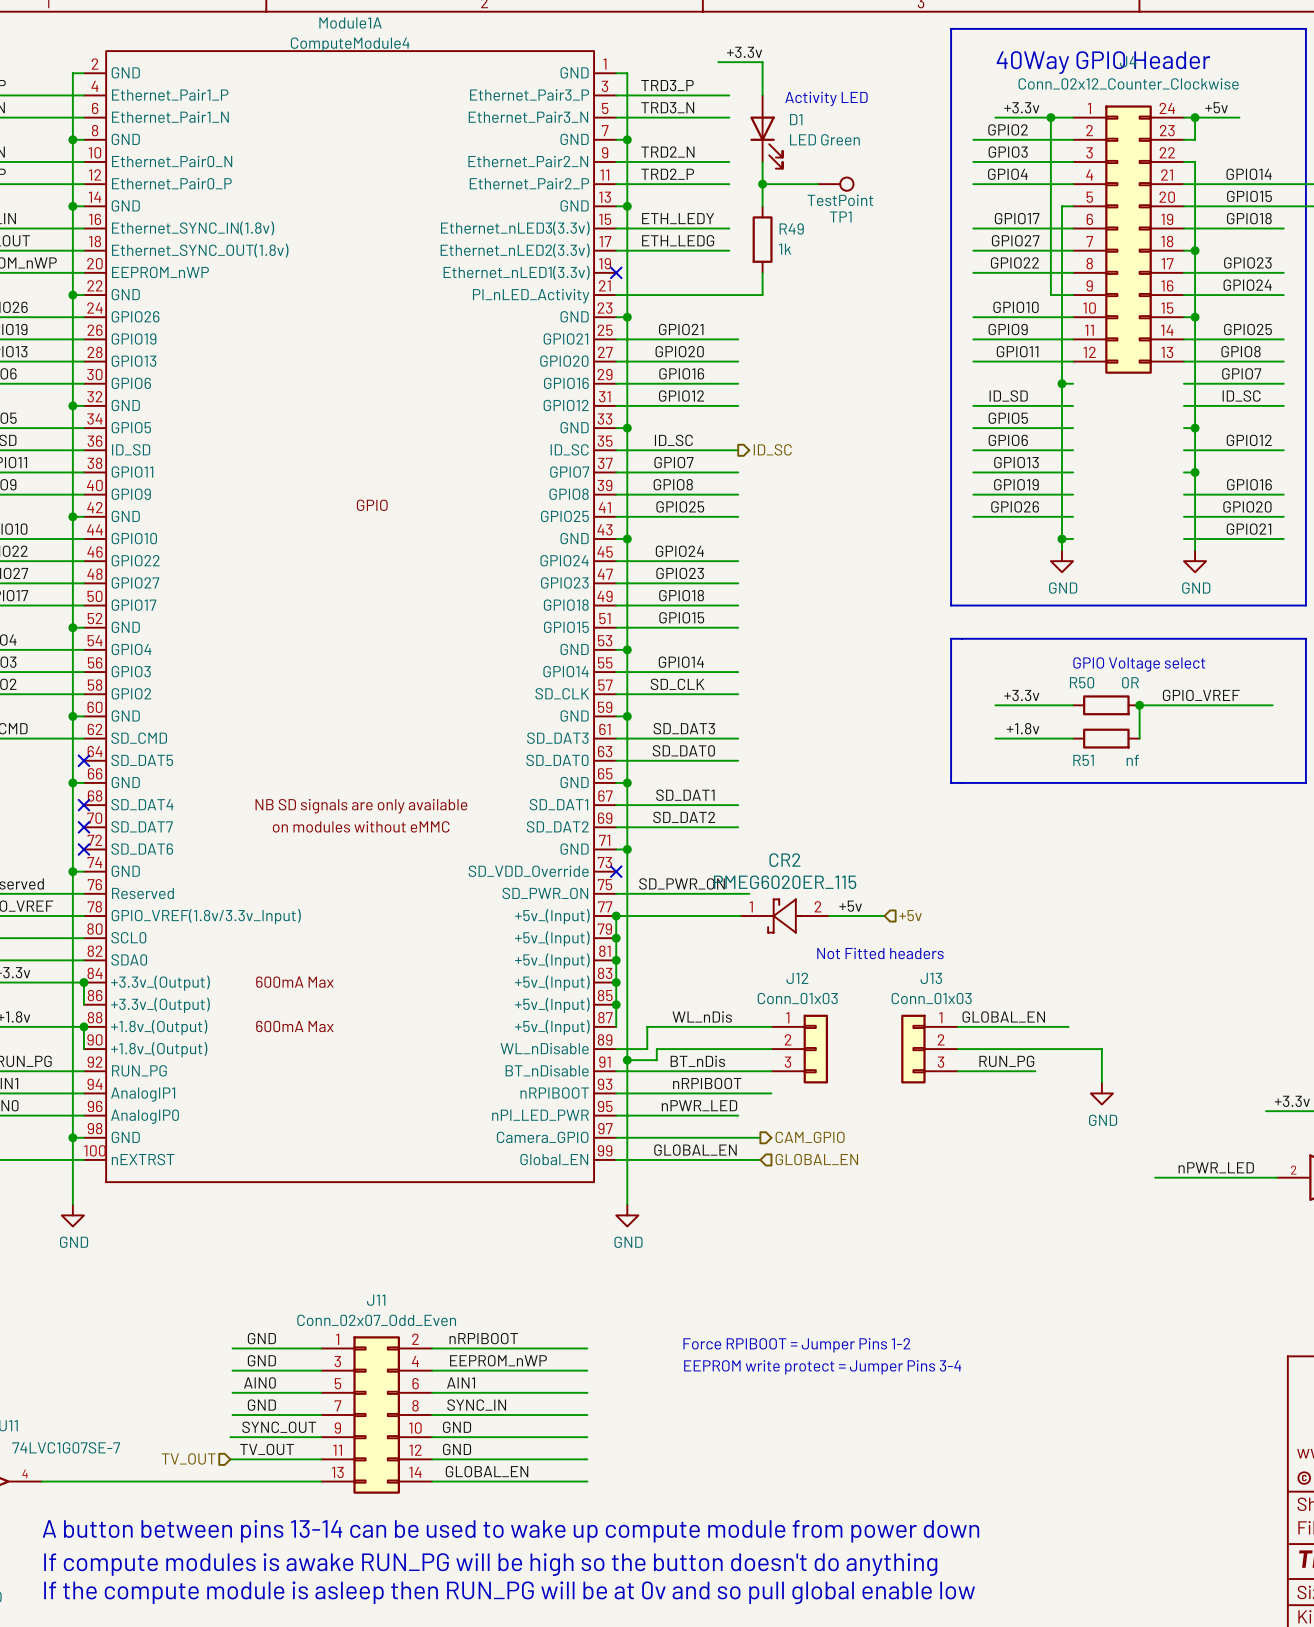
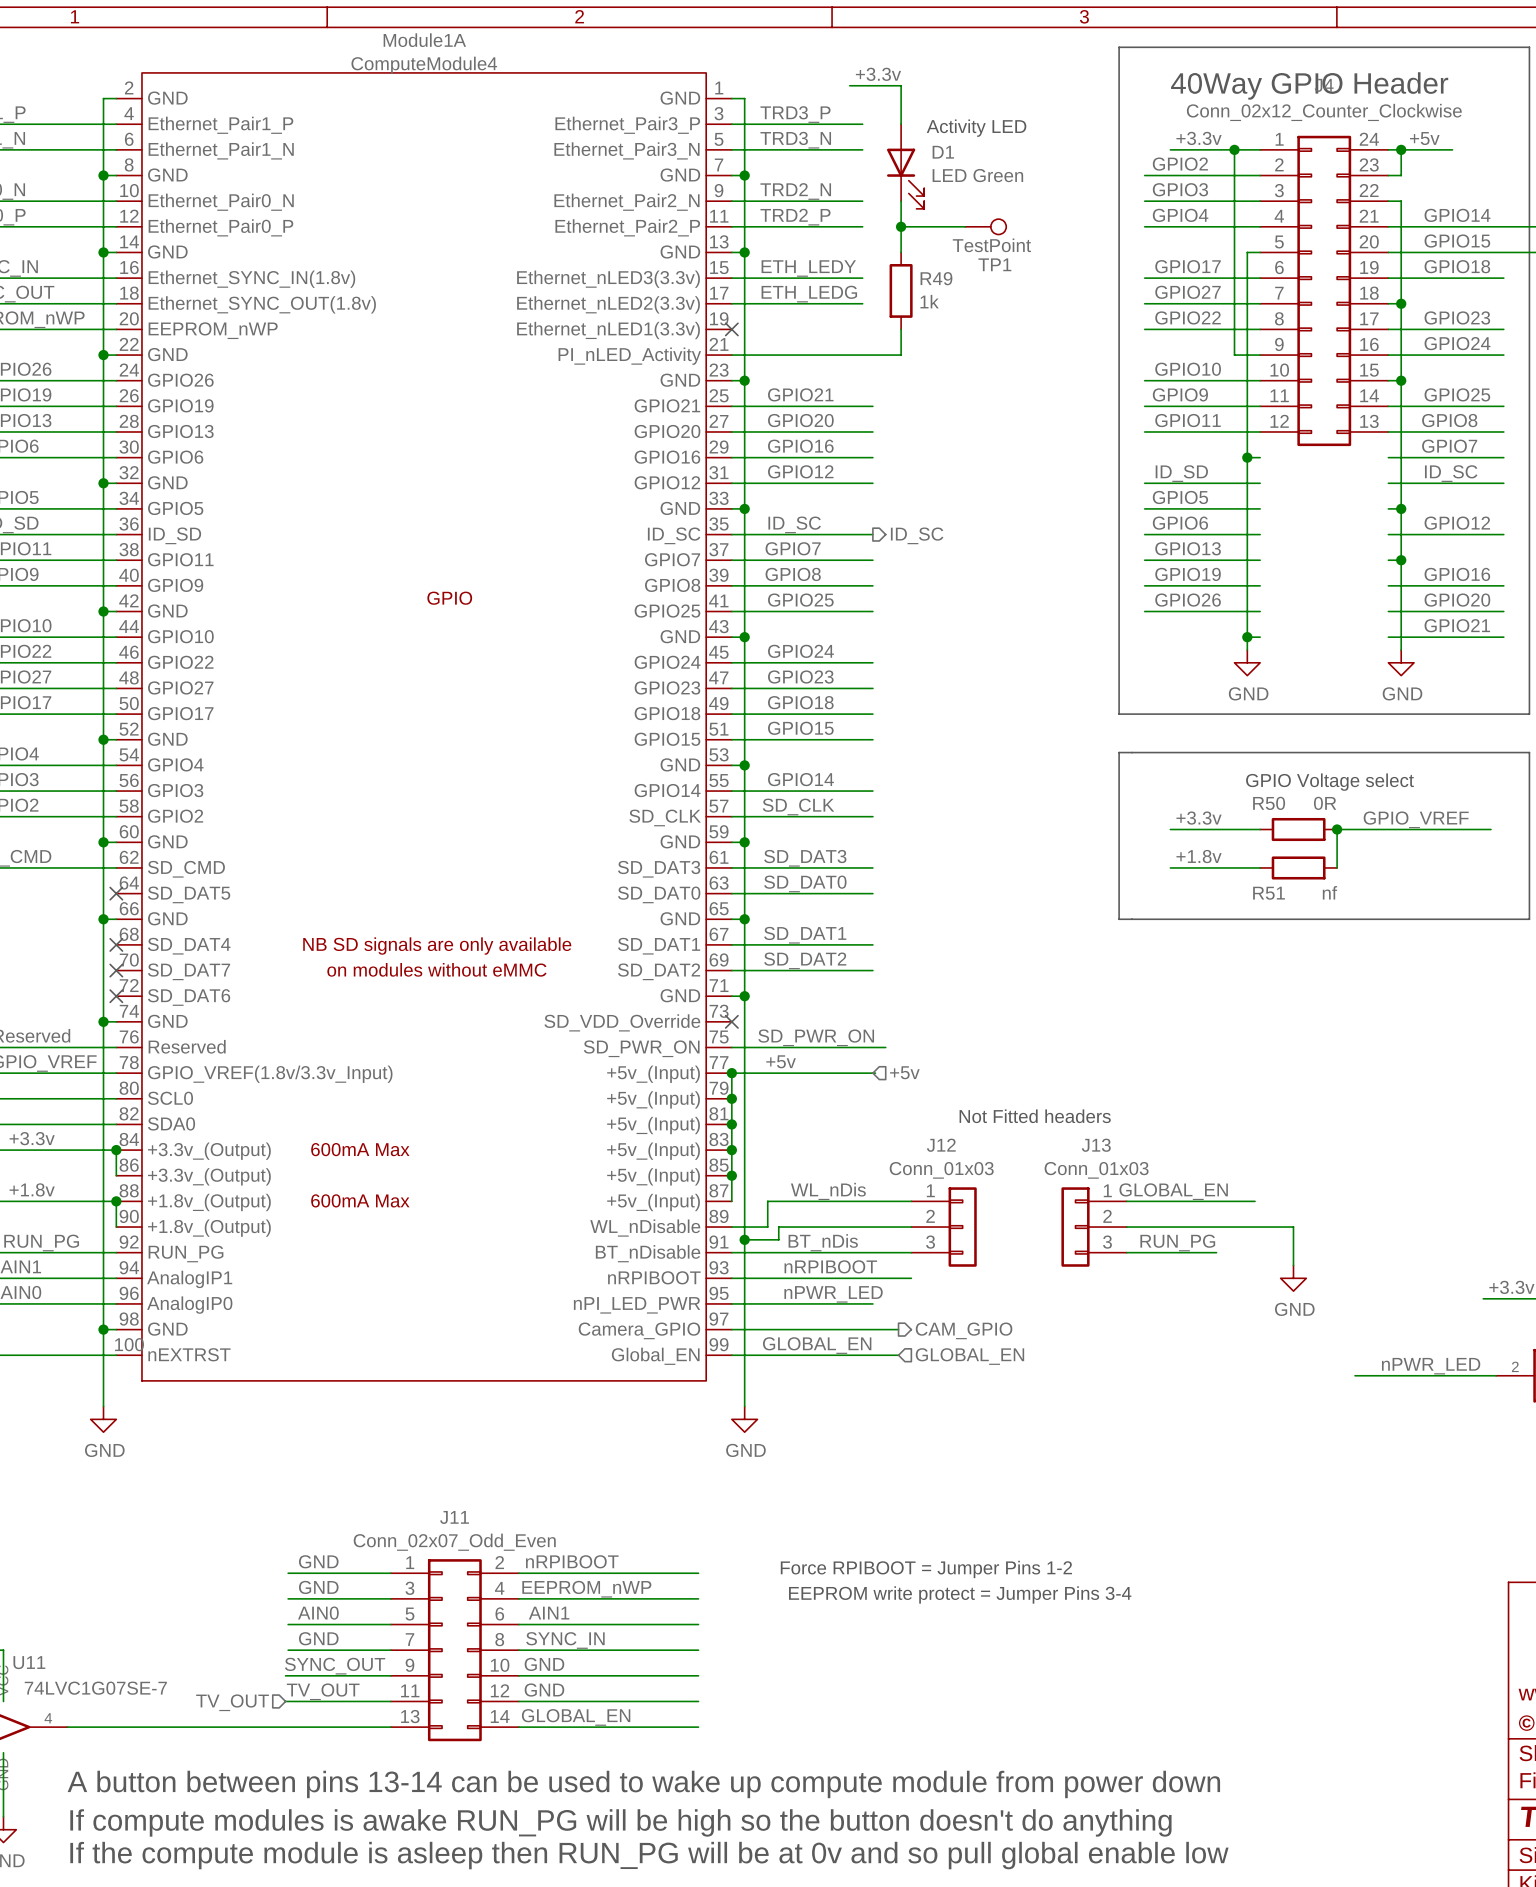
label position: +5v (850, 906) -> +5v (781, 1061)
hierarchical label position: +5v (910, 915) -> +5v (904, 1072)
CR2: PMEG6020ER_115 (784, 916) -> none
wire: (829, 916) (884, 916) -> none

